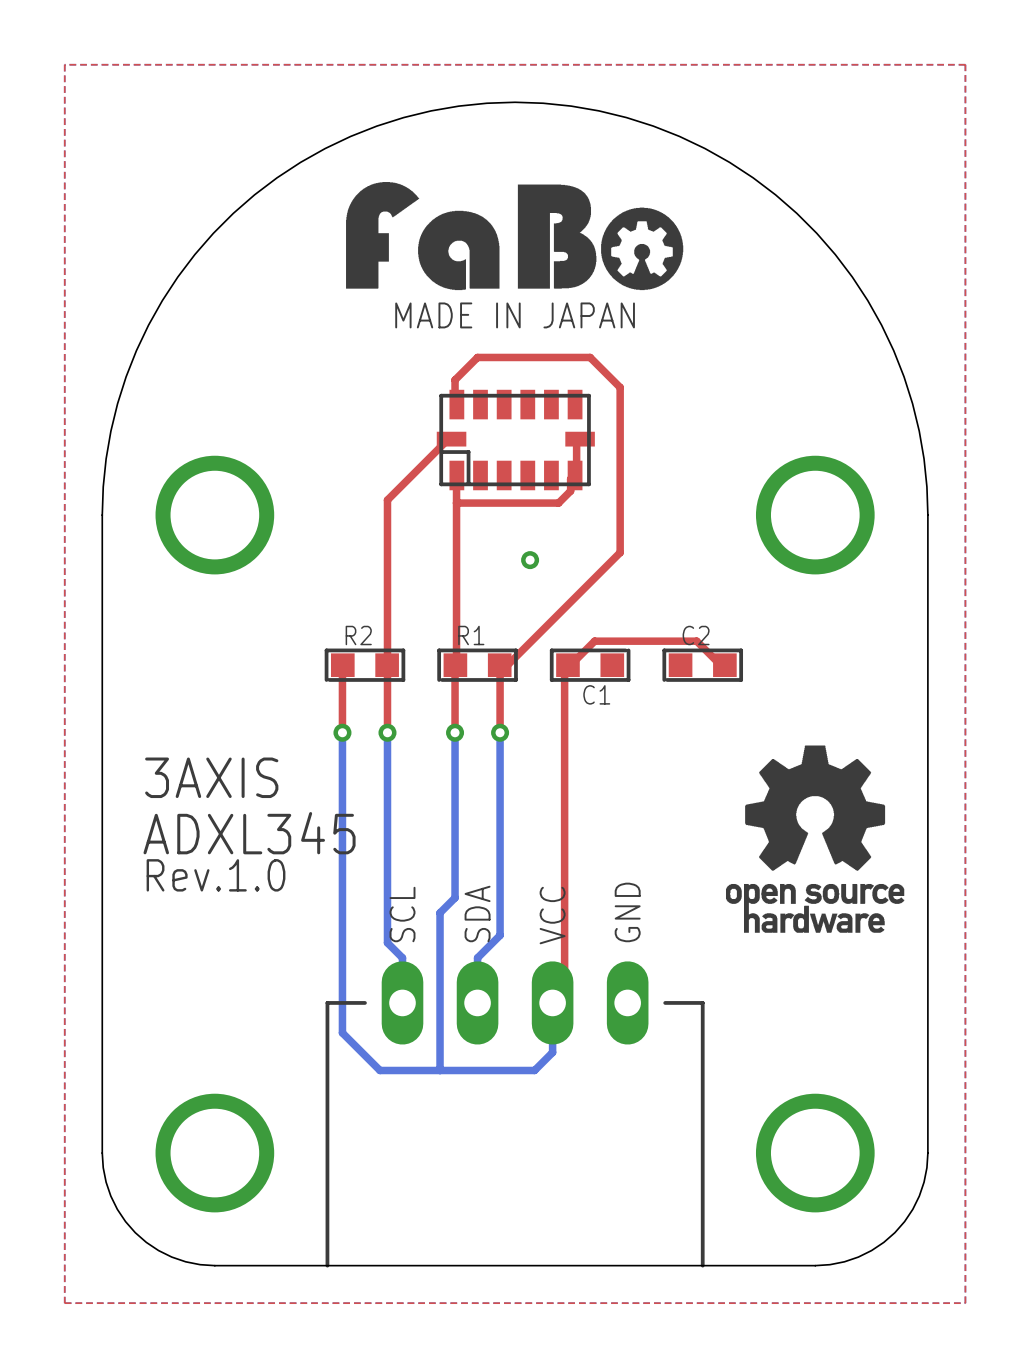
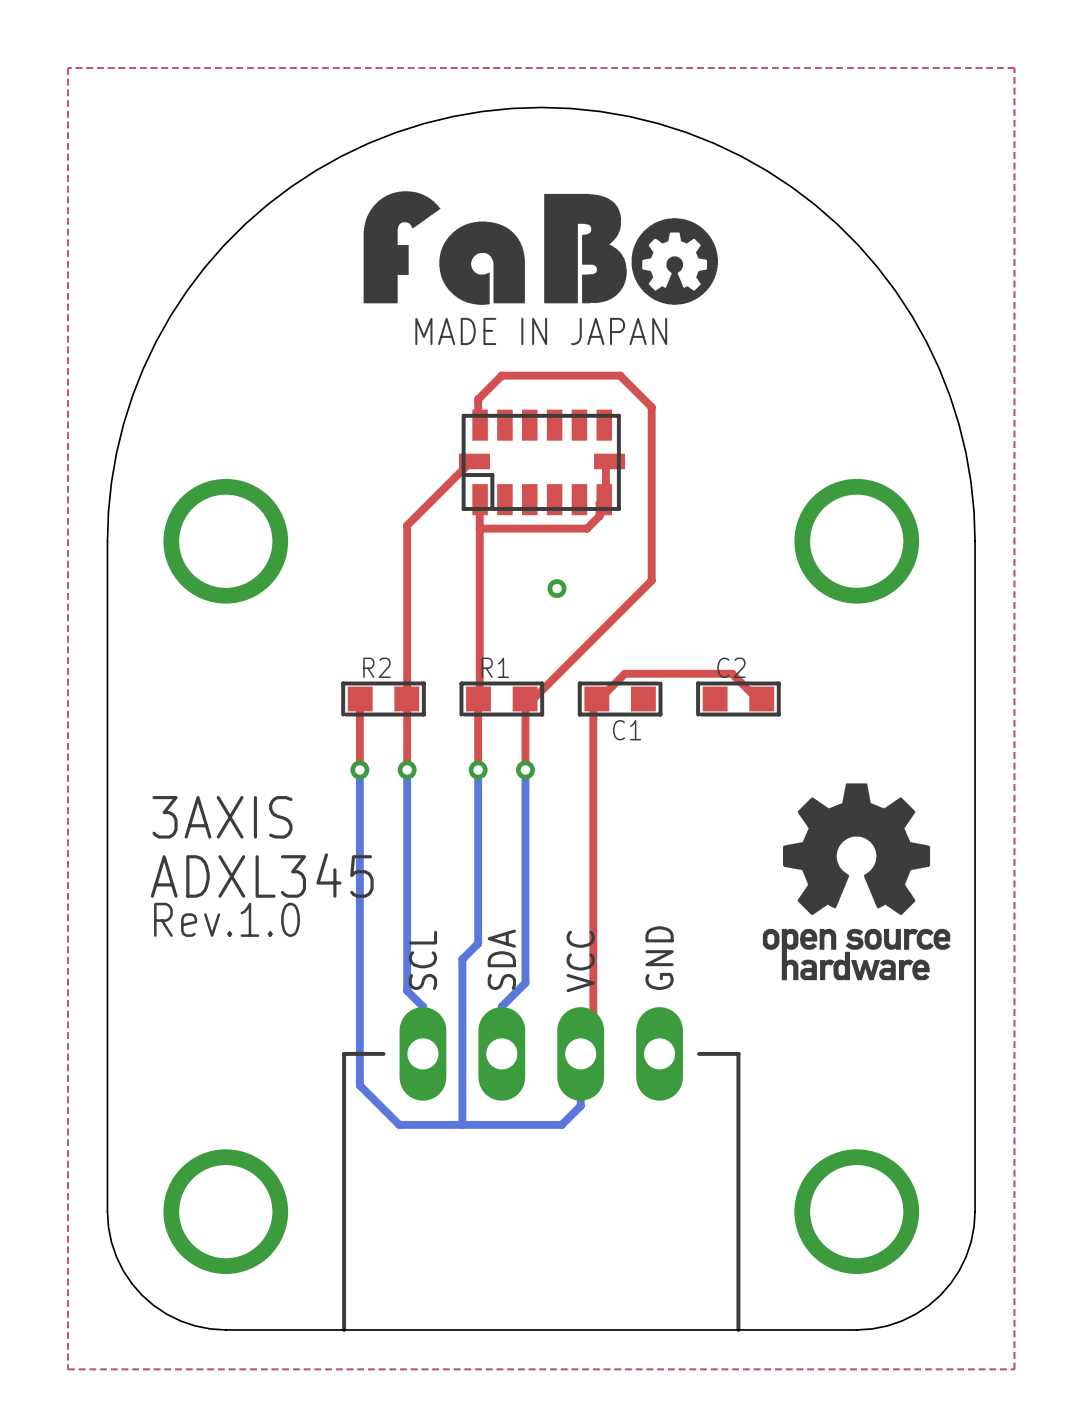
part footprint: [102, 102, 928, 1268] -> [107, 107, 976, 1332]

